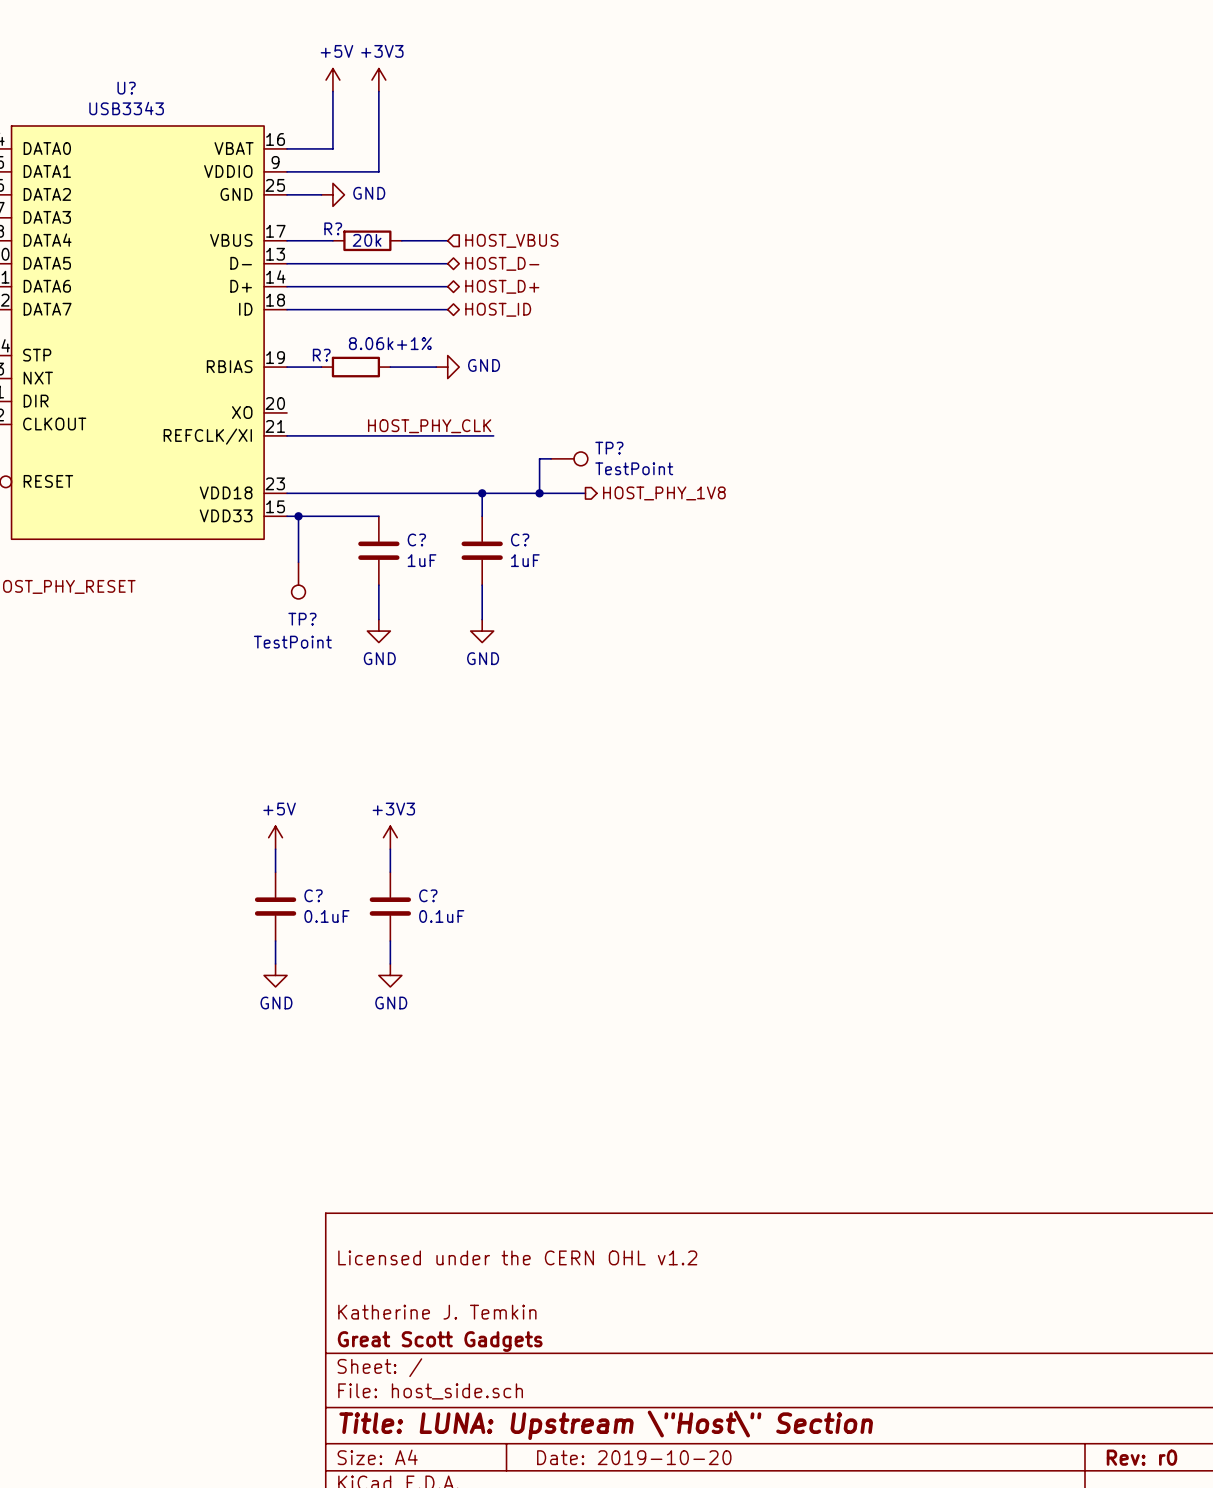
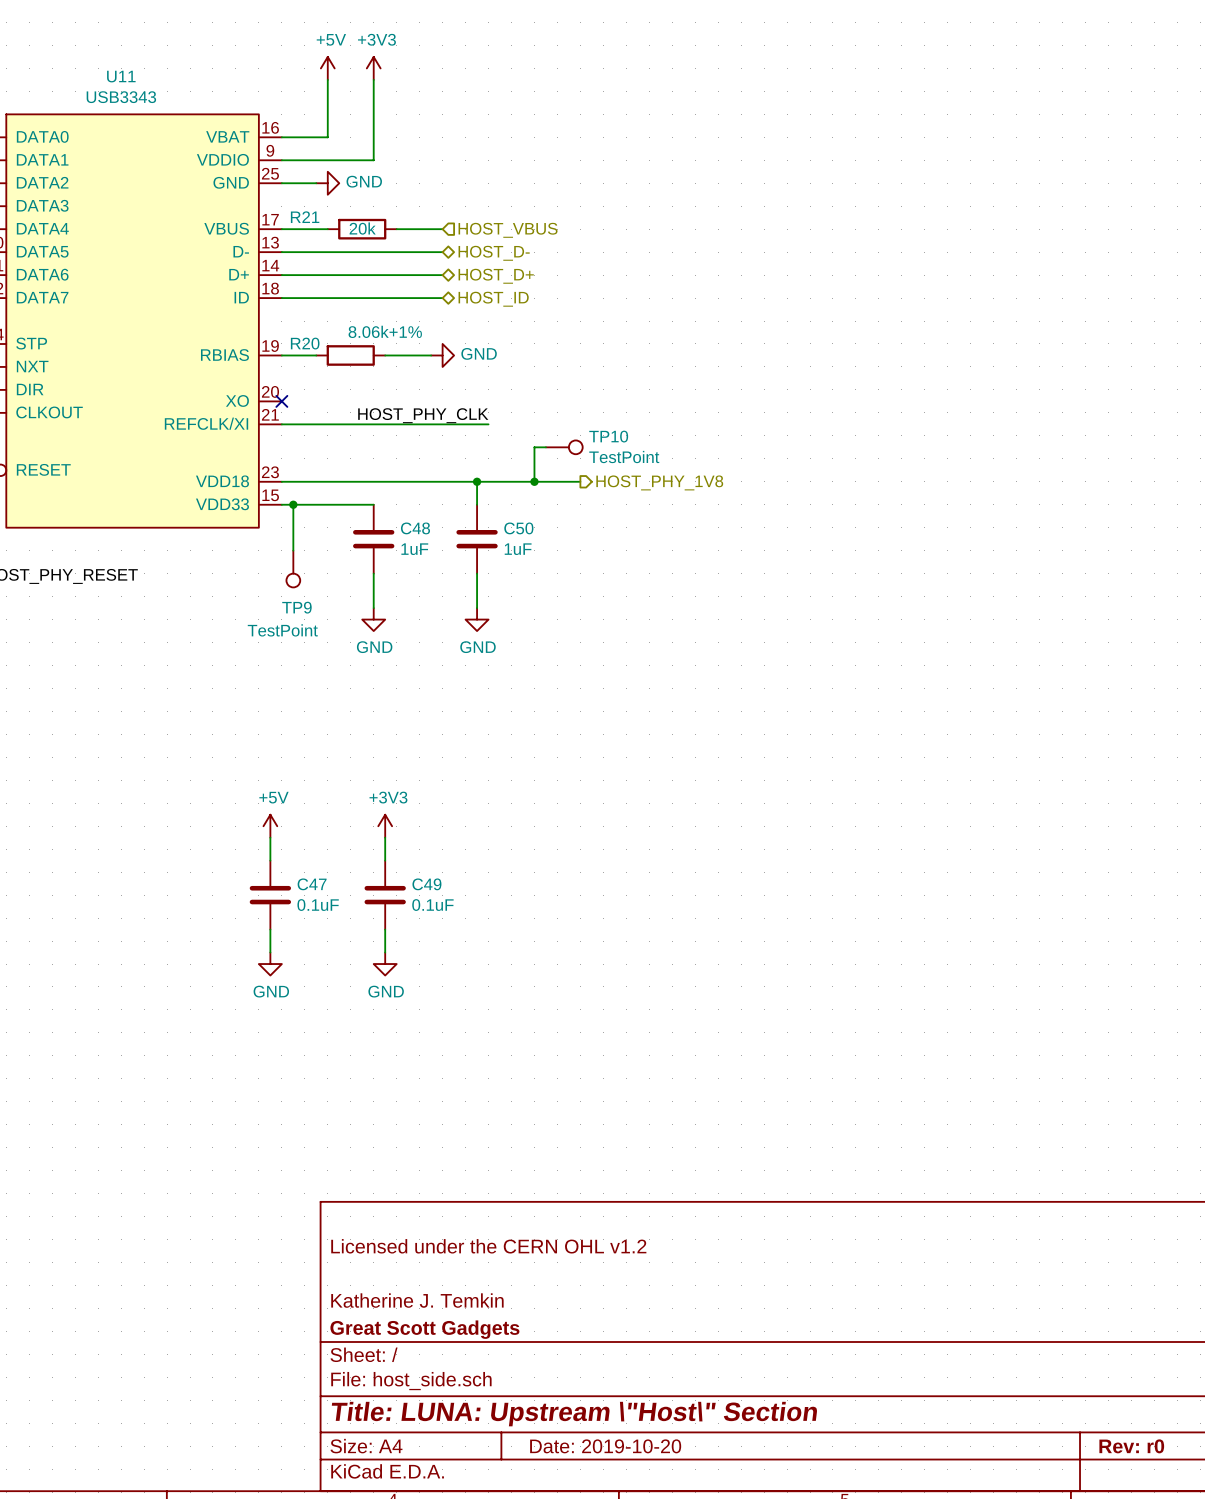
U? name: U? (126, 88) -> U11 (121, 76)
R? name: R? (333, 228) -> R21 (305, 217)
R? name: R? (321, 355) -> R20 (305, 343)
no-connect mark: none -> (281, 401)
TP? name: TP? (609, 448) -> TP10 (608, 436)
C? name: C? (416, 539) -> C48 (415, 528)
C? name: C? (520, 539) -> C50 (518, 528)
TP? name: TP? (302, 619) -> TP9 (296, 607)
C? name: C? (313, 895) -> C47 (312, 884)
C? name: C? (428, 895) -> C49 (426, 884)

